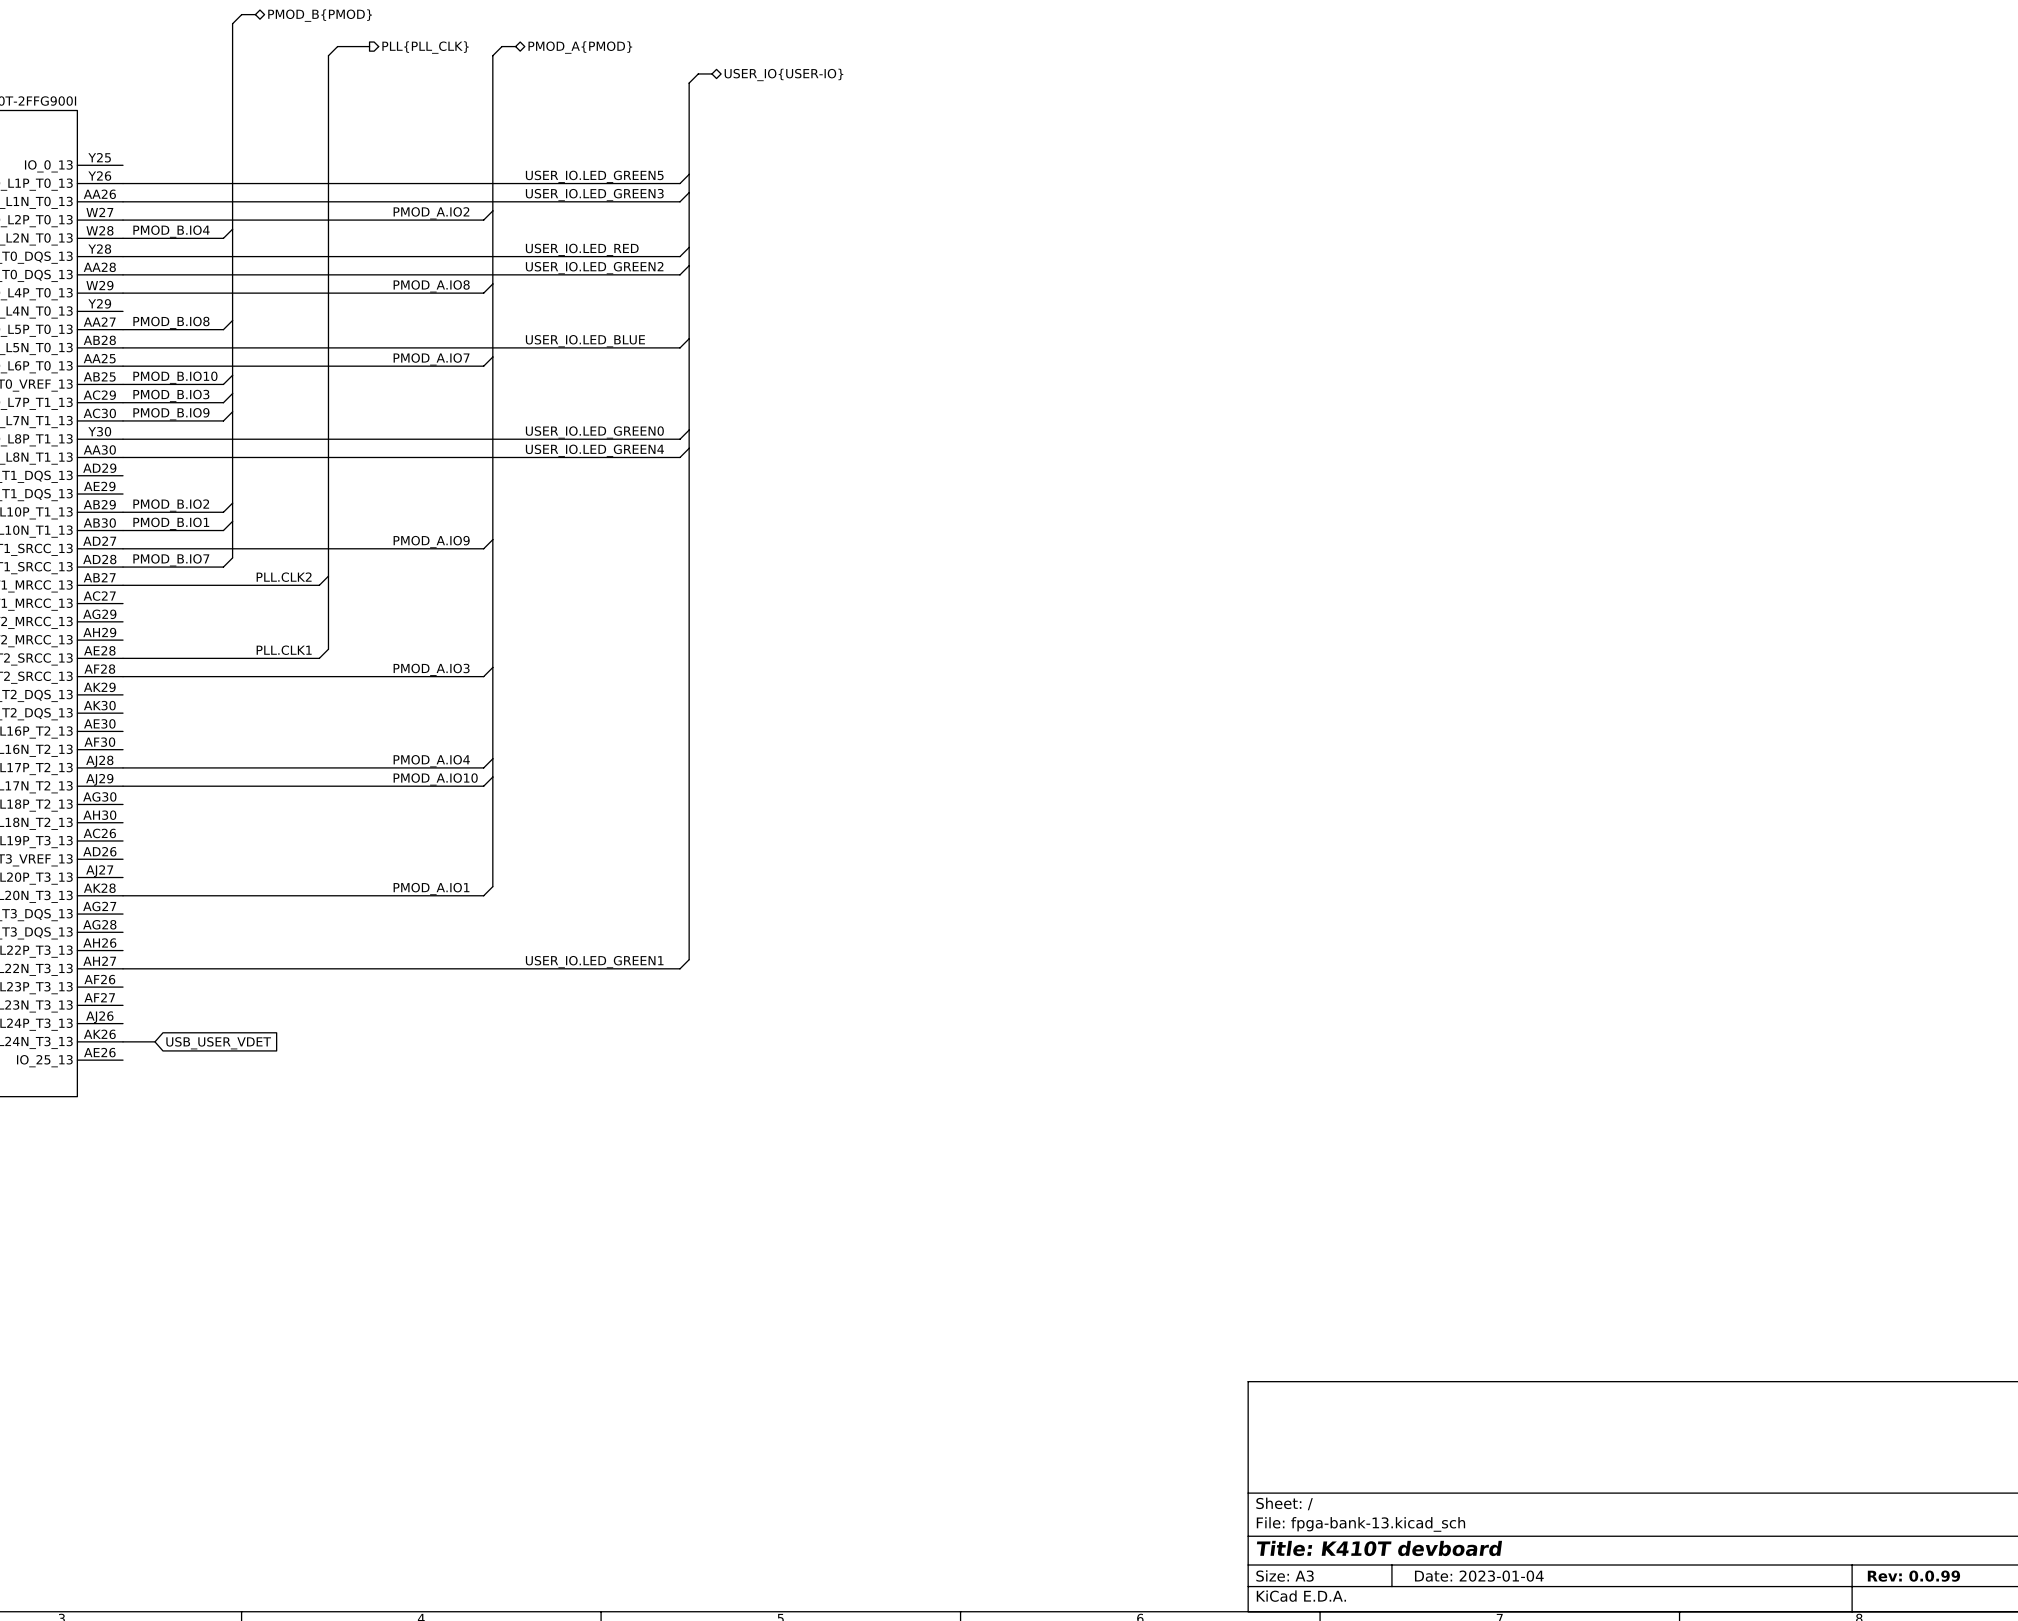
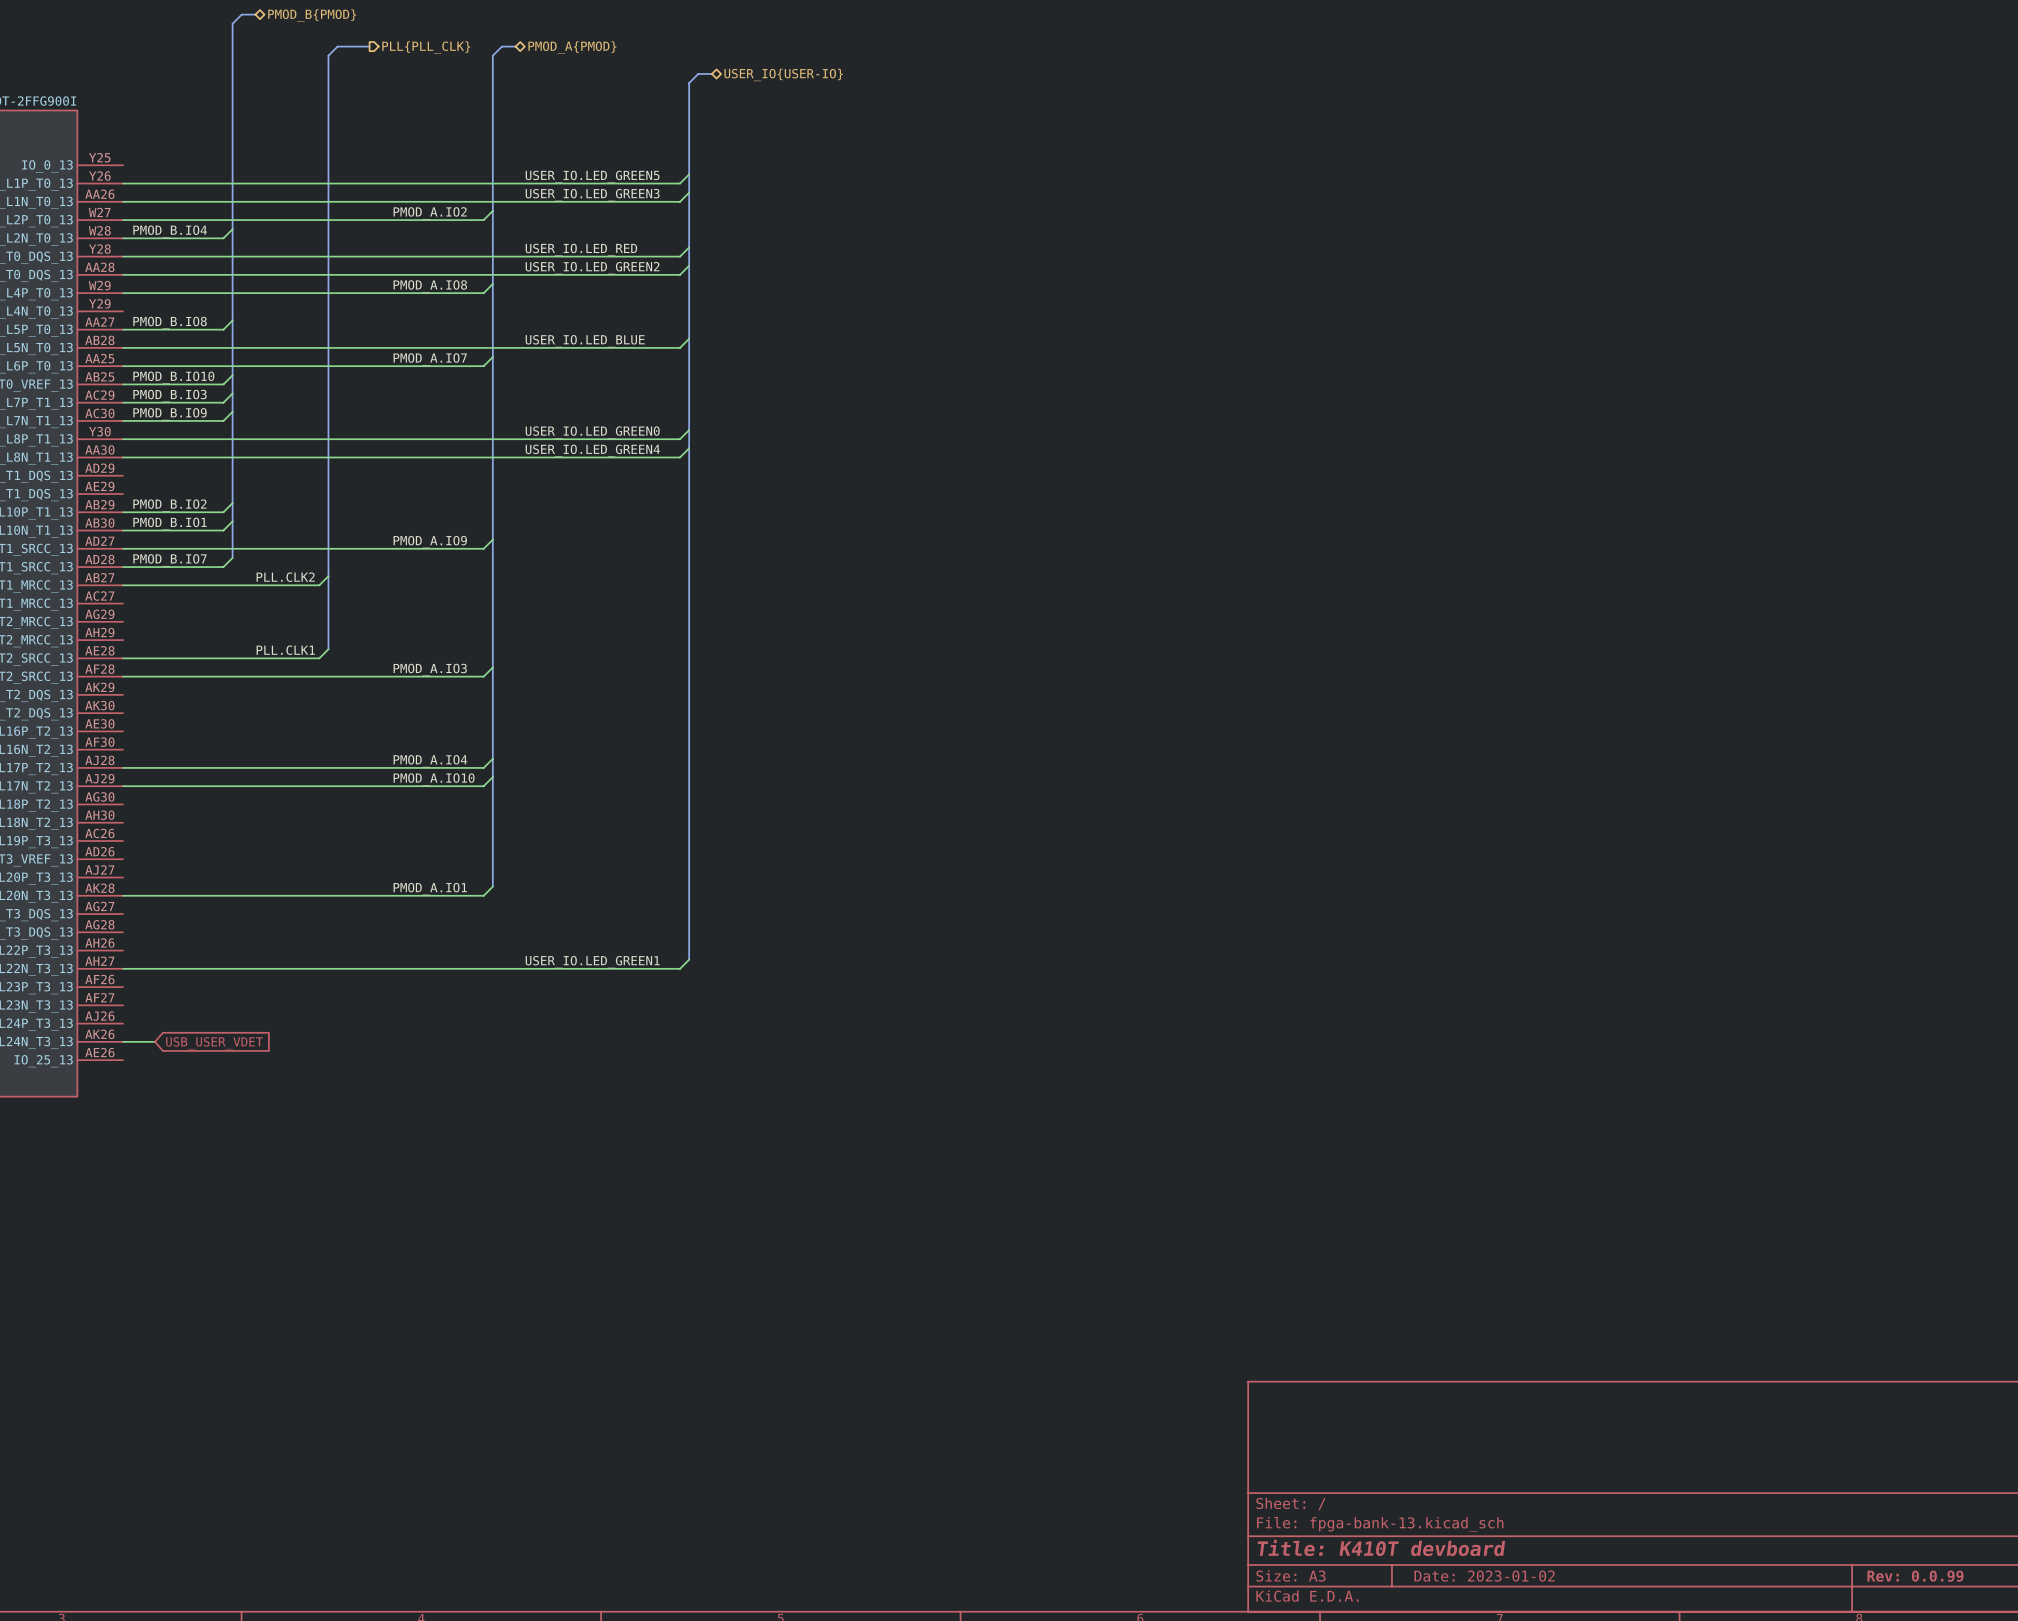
title block: Date: 2023-01-04 (1479, 1576) -> Date: 2023-01-02 (1484, 1576)

